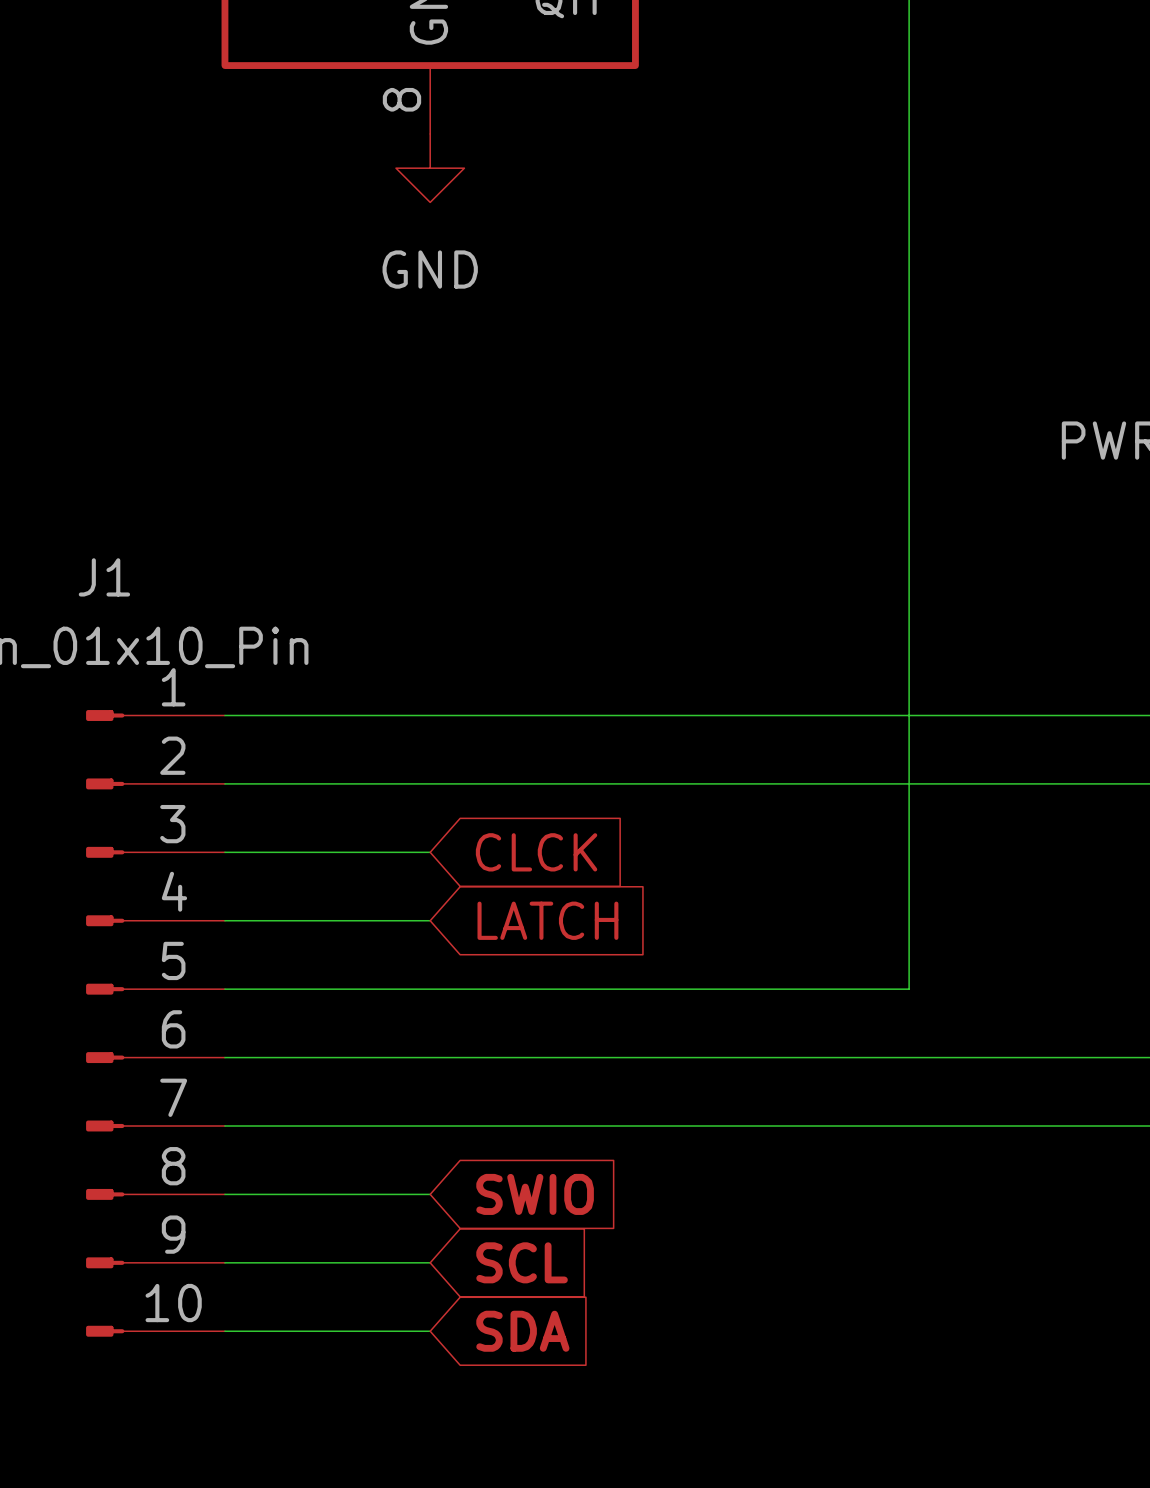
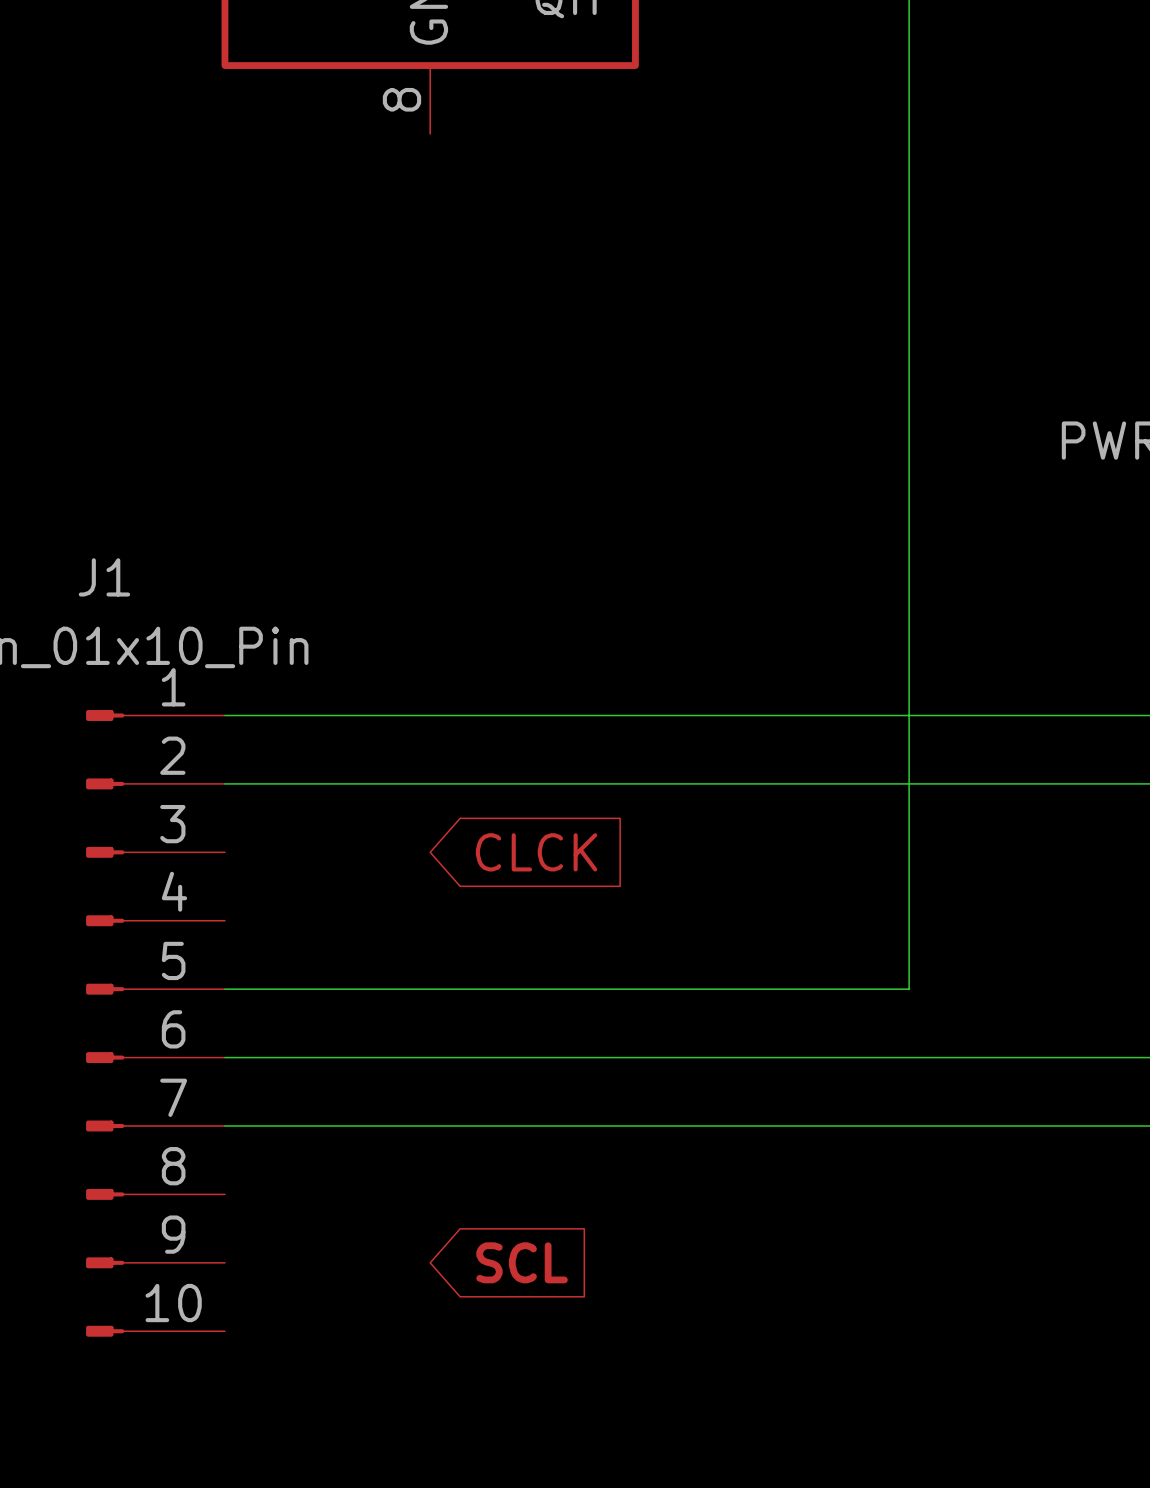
power symbol: GND (430, 168) -> none
wire: (224, 852) (430, 852) -> none
wire: (224, 920) (430, 920) -> none
global label: LATCH (547, 920) -> none
wire: (224, 1194) (430, 1194) -> none
global label: SWIO (535, 1194) -> none
wire: (224, 1262) (430, 1262) -> none
wire: (224, 1331) (430, 1331) -> none
global label: SDA (522, 1331) -> none

